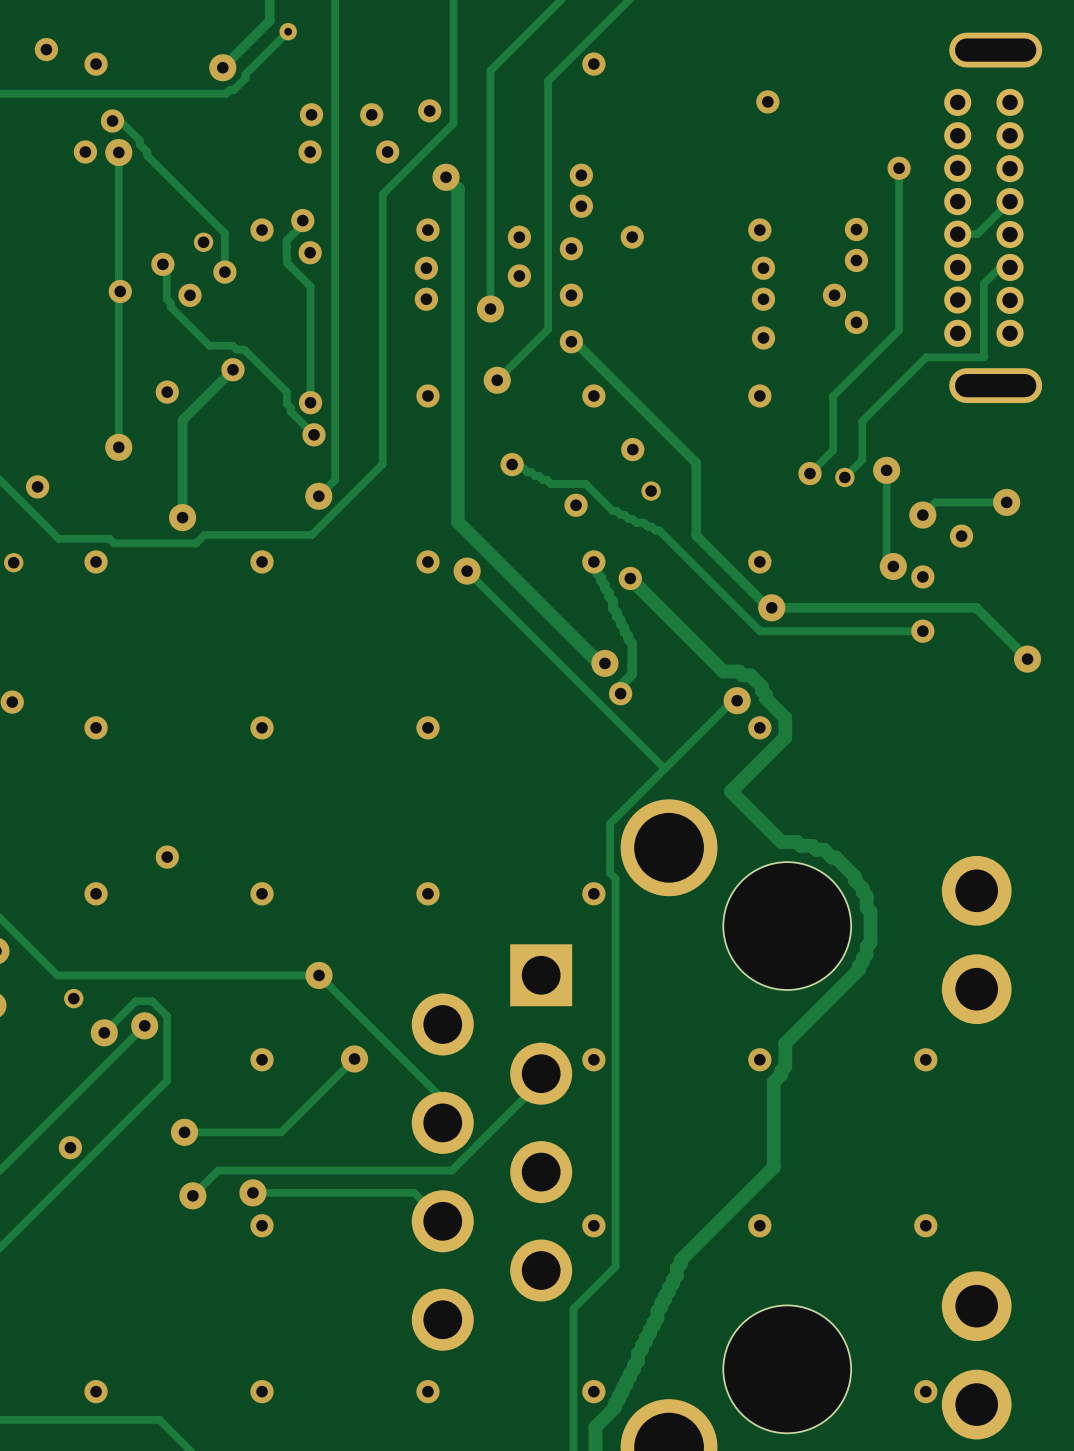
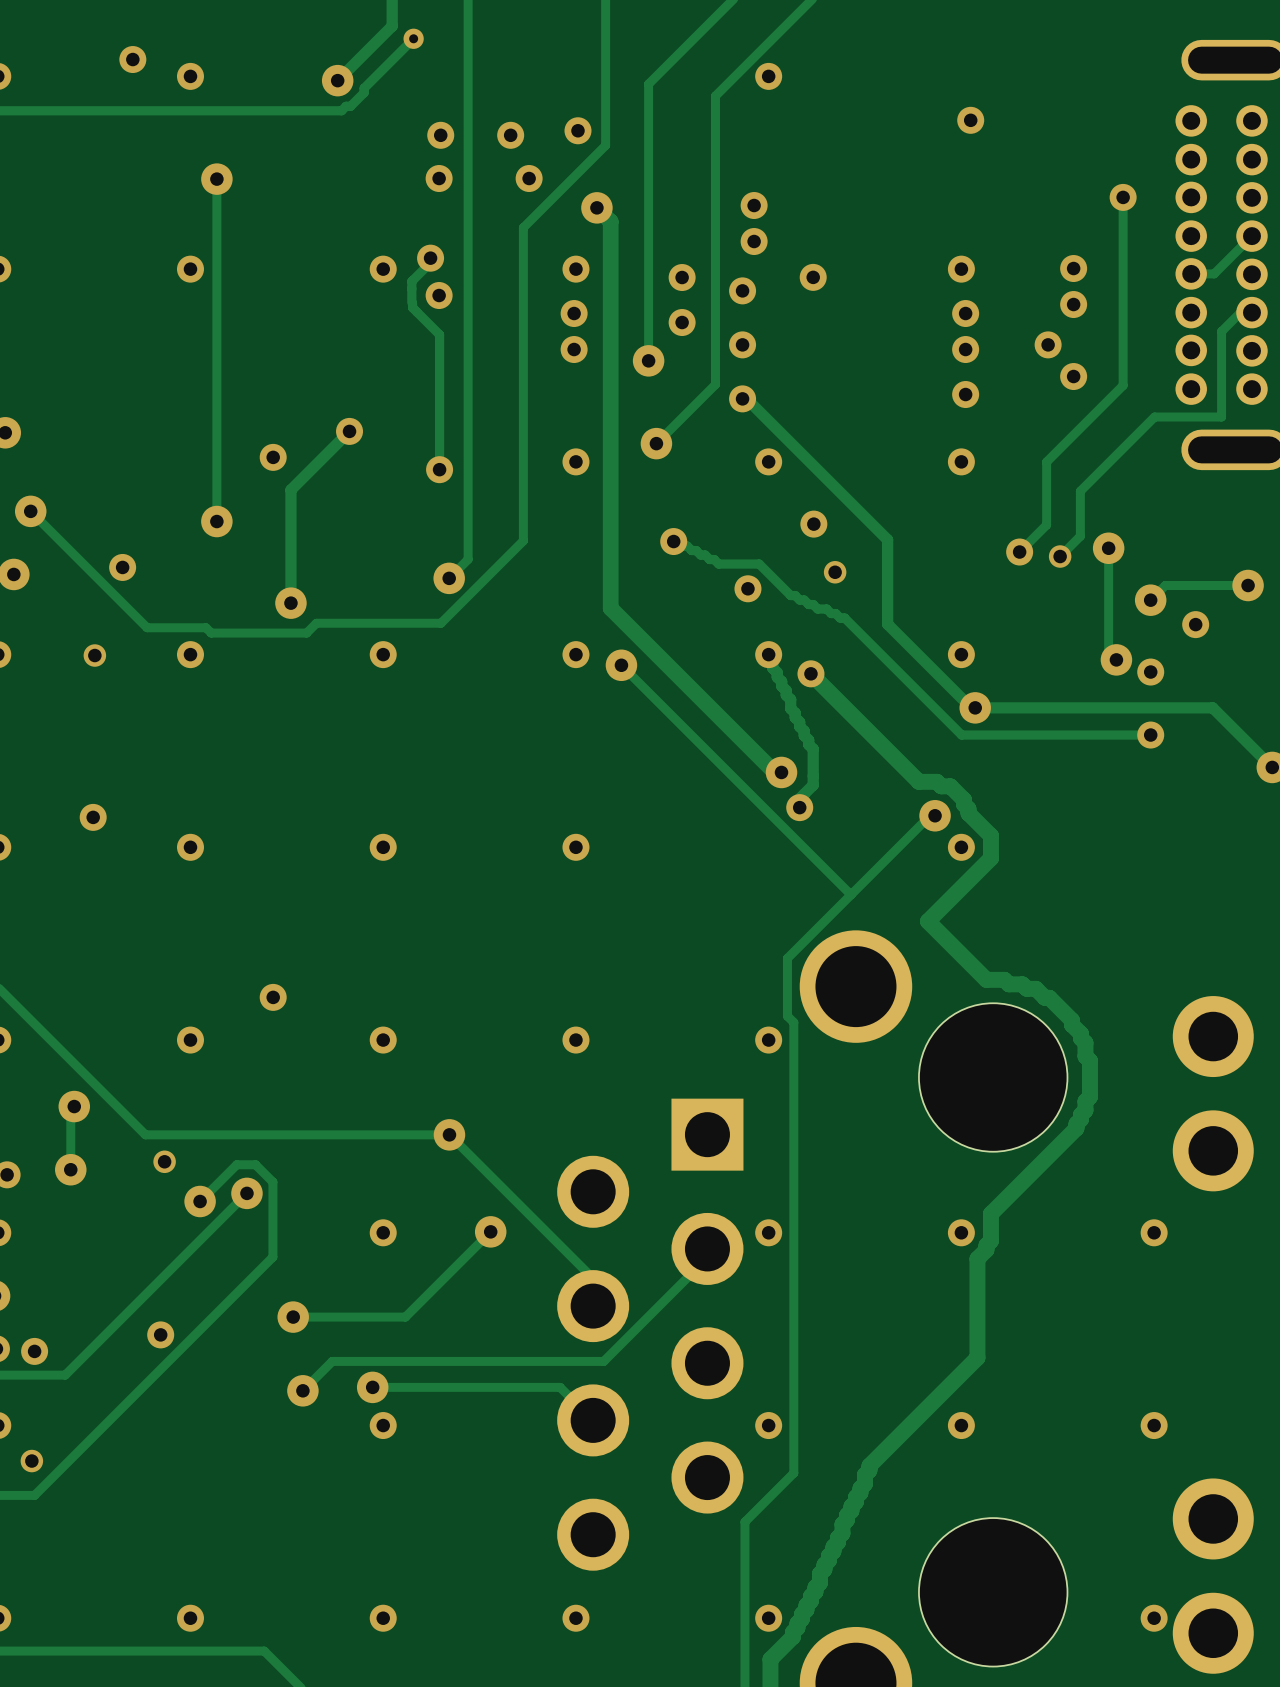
track: (112, 121) (120, 121) (139, 140) (139, 144) (147, 151) (147, 155) (224, 233) (224, 272) -> none
via: (112, 121) -> none
via: (85, 151) -> none
via: none -> (190, 269)
via: (203, 242) -> none
track: (162, 264) (166, 268) (166, 299) (170, 303) (170, 306) (209, 345) (232, 345) (236, 349) (244, 349) (286, 392) (286, 403) (290, 407) (290, 411) (314, 434) -> none
via: (162, 264) -> none
via: (224, 272) -> none
via: (120, 291) -> none
via: (190, 295) -> none
via: (314, 434) -> none

